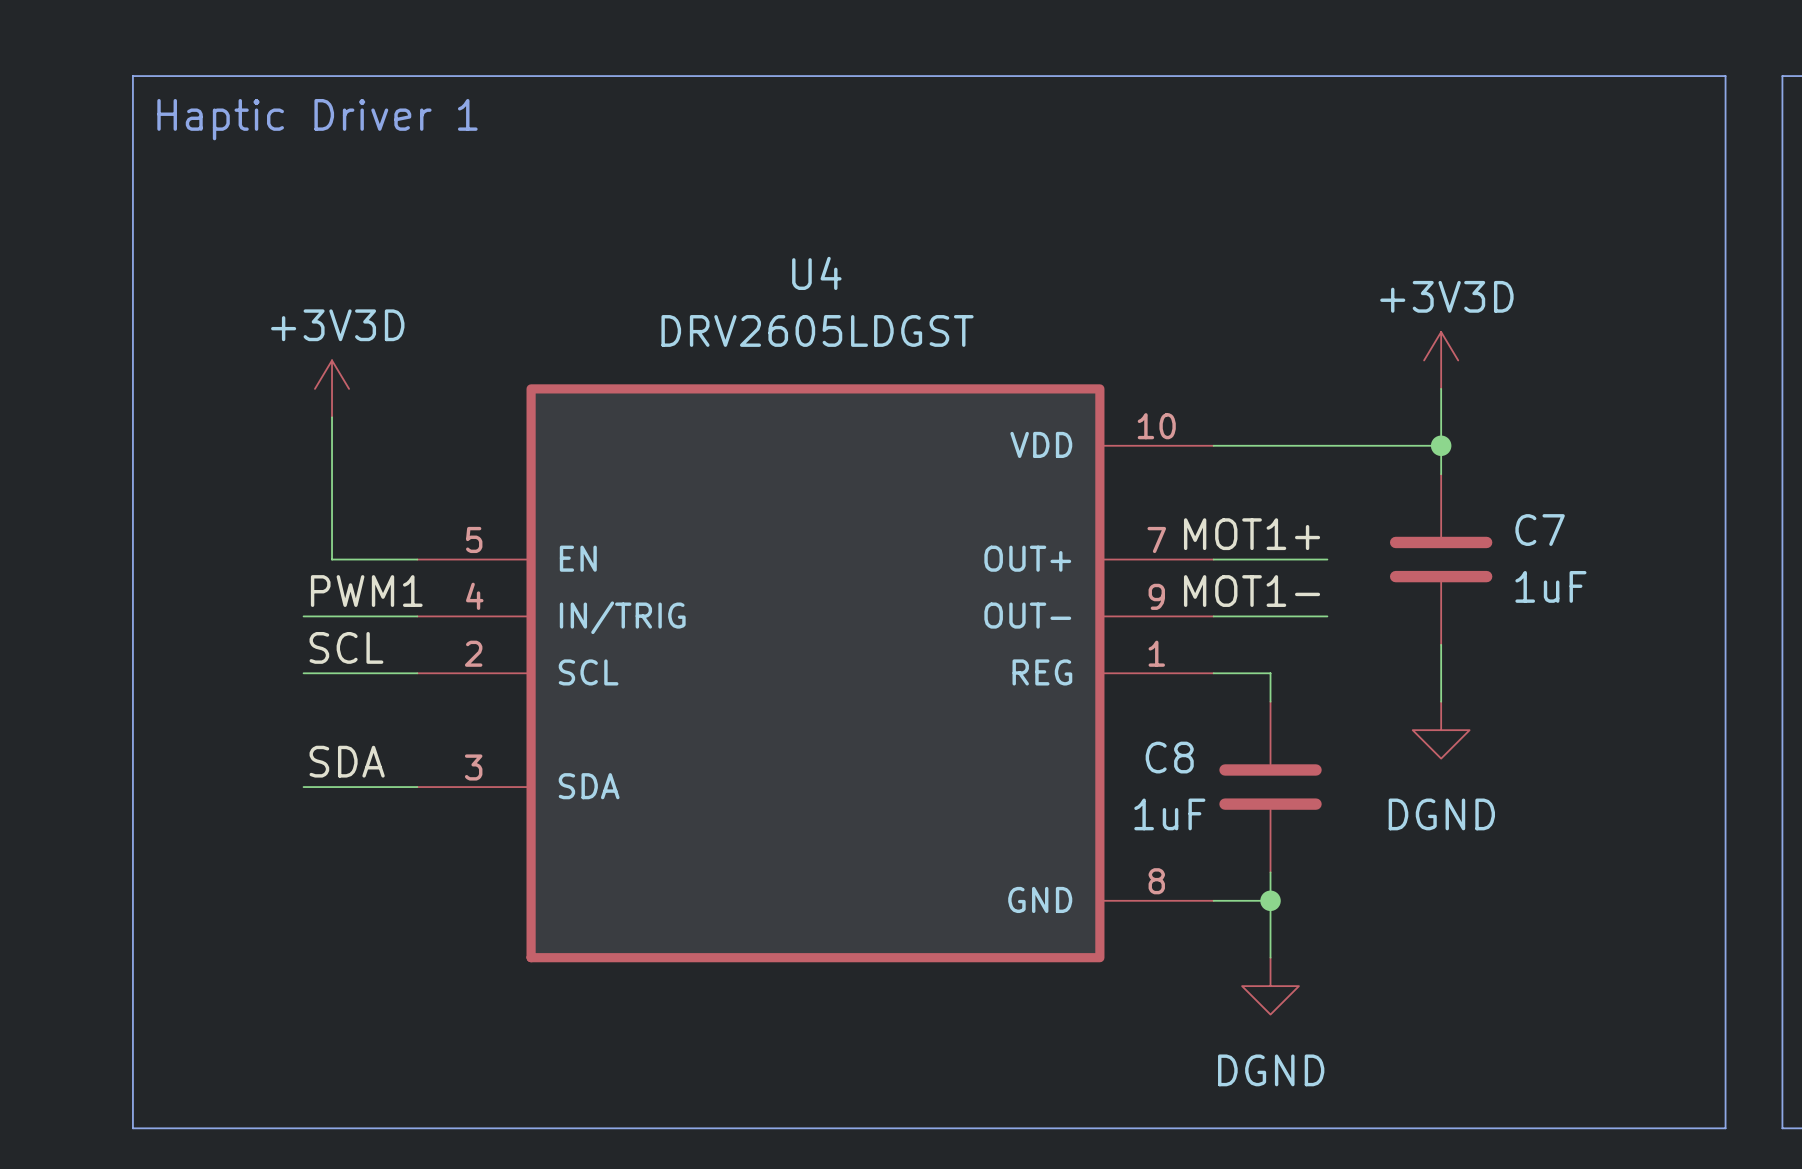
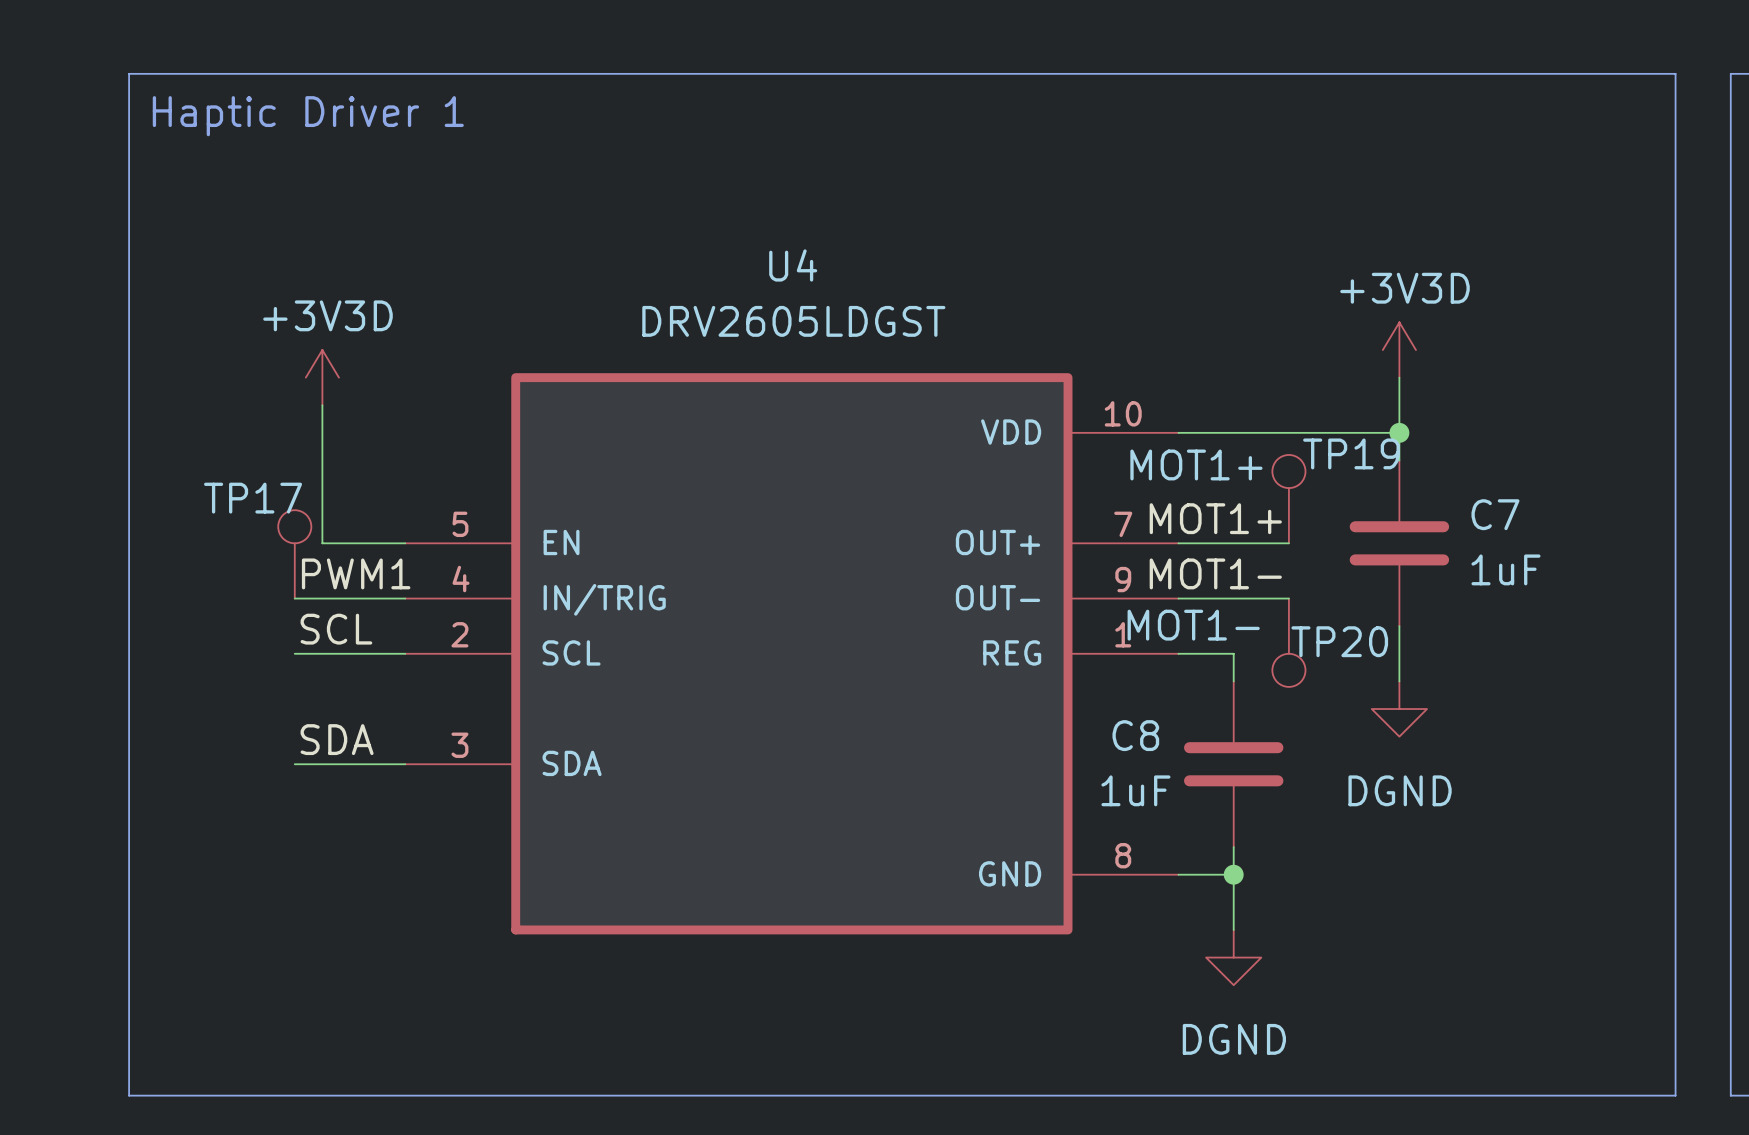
TP19: none -> MOT1+ (1288, 499)
TP17: none -> (294, 554)
TP20: none -> MOT1- (1288, 642)

